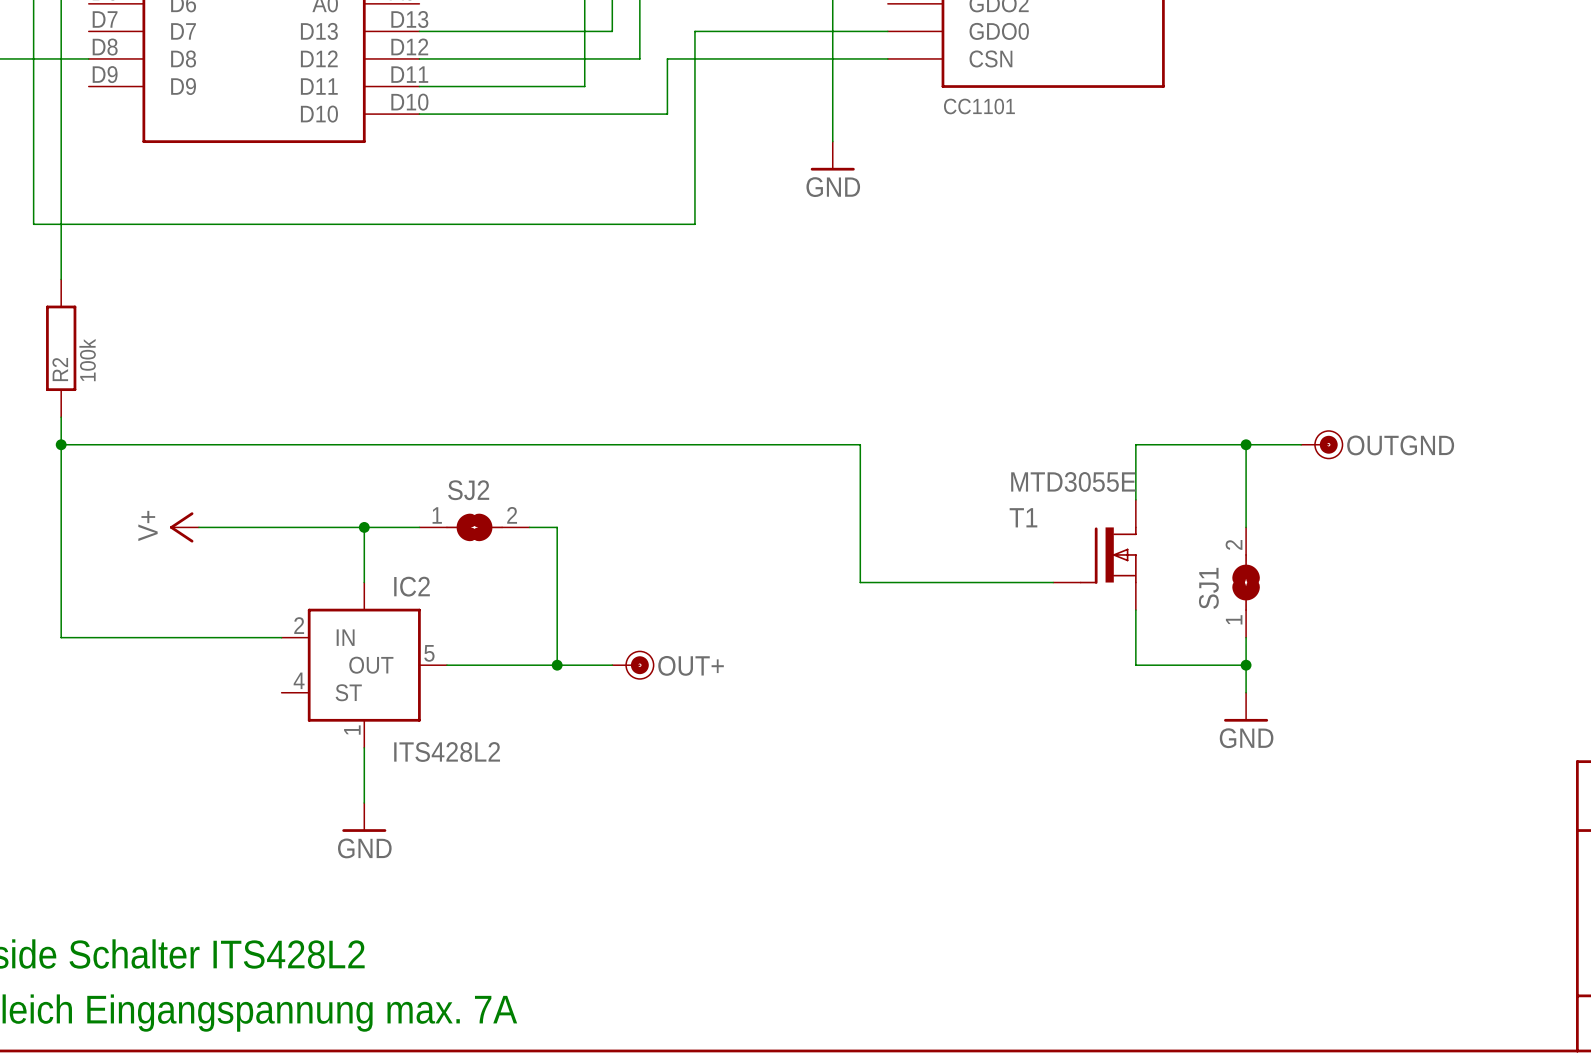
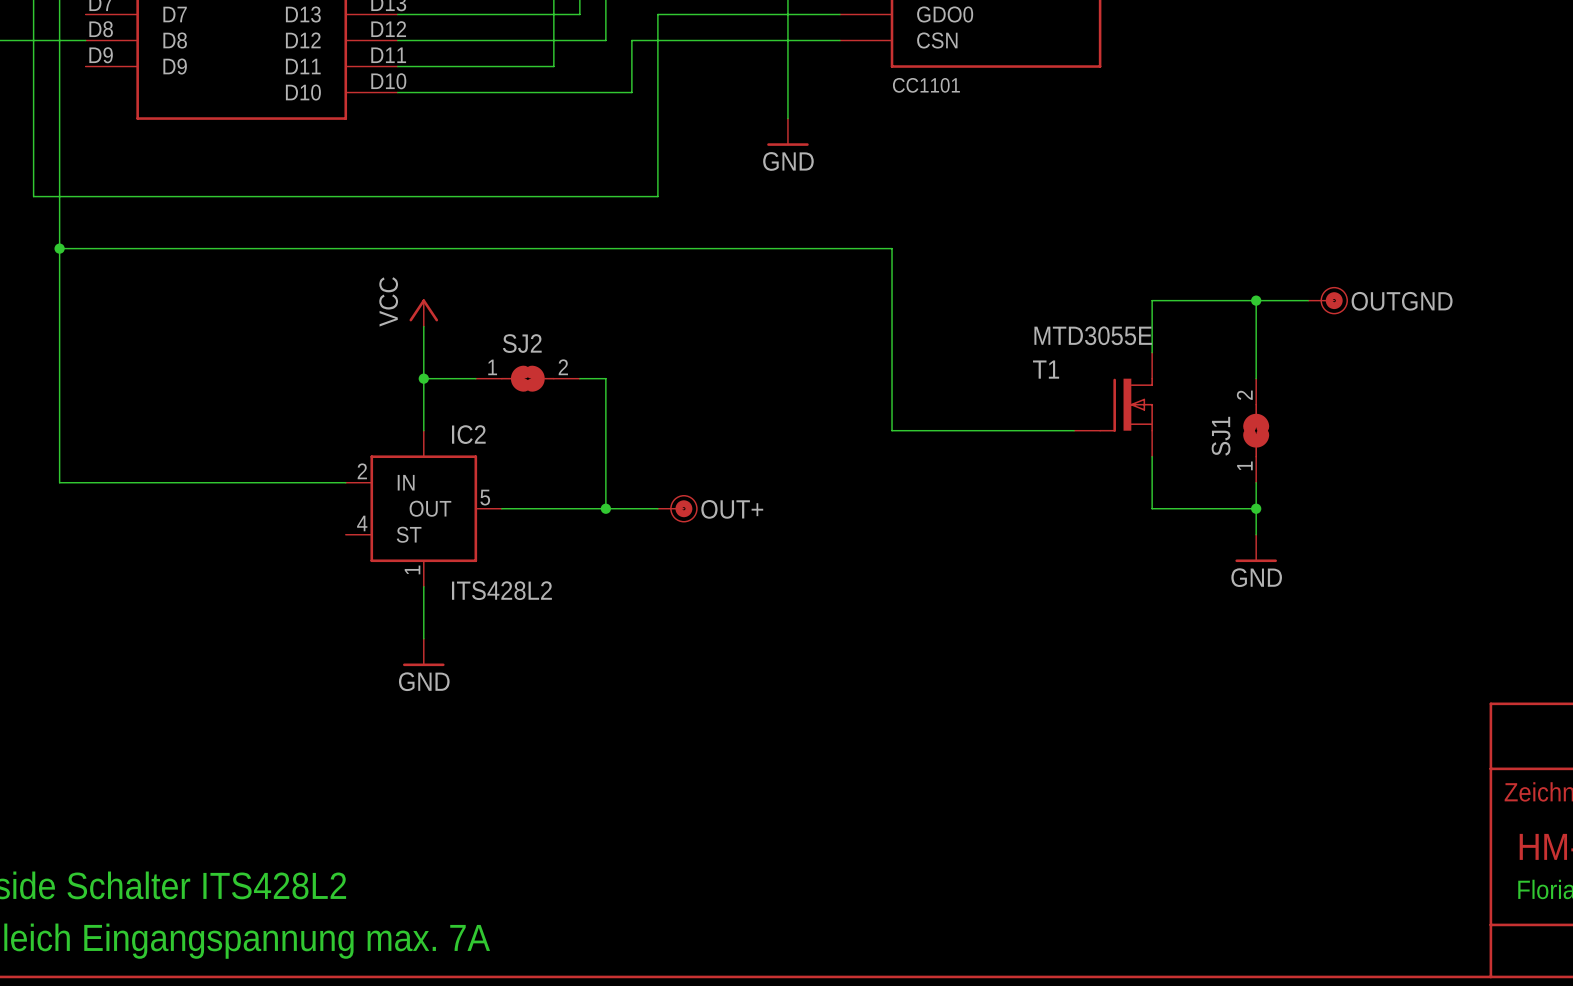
junction: none -> (59, 248)
junction: none -> (1256, 300)
power symbol: none -> VCC (423, 312)
R2: 100k (61, 348) -> none
wire: none -> (423, 326) (423, 430)
wire: none -> (59, 378) (59, 248) (892, 248) (892, 430) (1074, 430)
wire: none -> (423, 378) (475, 378)
junction: none -> (423, 378)
wire: (61, 444) (860, 444) (860, 582) (1053, 582) -> none
junction: (61, 444) -> none
wire: (1246, 444) (1246, 527) -> (1256, 300) (1256, 378)
junction: (1246, 444) -> none
wire: (1301, 444) (1135, 444) (1135, 499) -> (1308, 300) (1152, 300) (1152, 352)
OUTGND position: (1322, 444) -> (1327, 300)
wire: (61, 527) (61, 637) (281, 637) -> (59, 482) (189, 482)
power symbol: V+ (184, 527) -> none
junction: (364, 527) -> none
wire: (419, 527) (364, 527) (364, 582) -> none
SJ2 position: (474, 527) -> (527, 378)
wire: (529, 527) (557, 527) (557, 665) -> (579, 378) (605, 378) (605, 508)
junction: none -> (605, 508)
T1 position: (1094, 554) -> (1113, 404)
junction: none -> (1256, 508)
SJ1 position: (1246, 582) -> (1256, 430)
wire: (1135, 610) (1135, 665) (1246, 665) -> (1152, 456) (1152, 508) (1256, 508)
wire: (1246, 637) (1246, 692) -> (1256, 482) (1256, 534)
IC2 position: (364, 665) -> (423, 508)
wire: (446, 665) (612, 665) -> (501, 508) (657, 508)
junction: (557, 665) -> none
OUT+ position: (633, 665) -> (677, 508)
junction: (1246, 665) -> none
power symbol position: GND (1246, 707) -> GND (1256, 548)
wire: (364, 747) (364, 802) -> (423, 586) (423, 638)
power symbol position: GND (364, 817) -> GND (423, 652)

